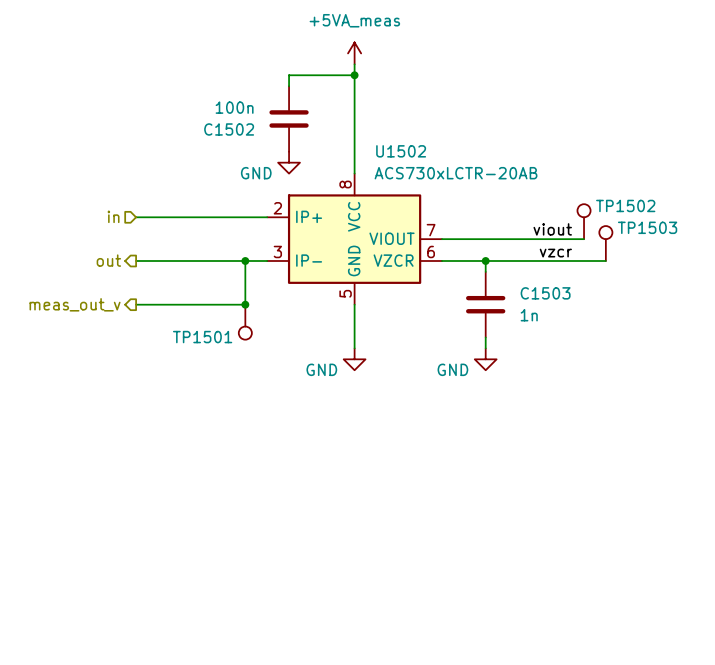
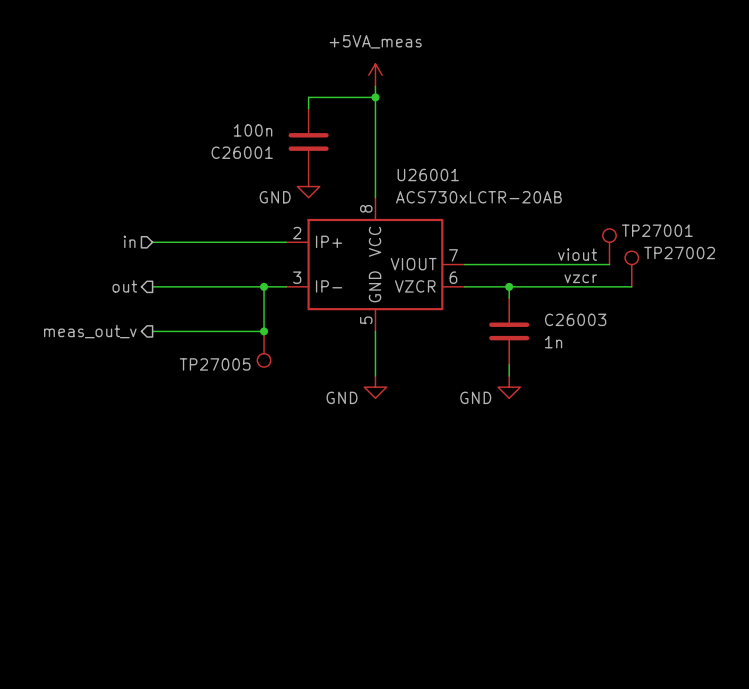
C1502 name: C1502 (229, 129) -> C26001 (242, 152)
U1502 name: U1502 (401, 151) -> U26001 (428, 174)
TP1502 name: TP1502 (625, 205) -> TP27001 (657, 230)
TP1503 name: TP1503 (647, 227) -> TP27002 (679, 253)
C1503 name: C1503 (545, 293) -> C26003 (575, 319)
TP1501 name: TP1501 (202, 337) -> TP27005 (215, 364)

